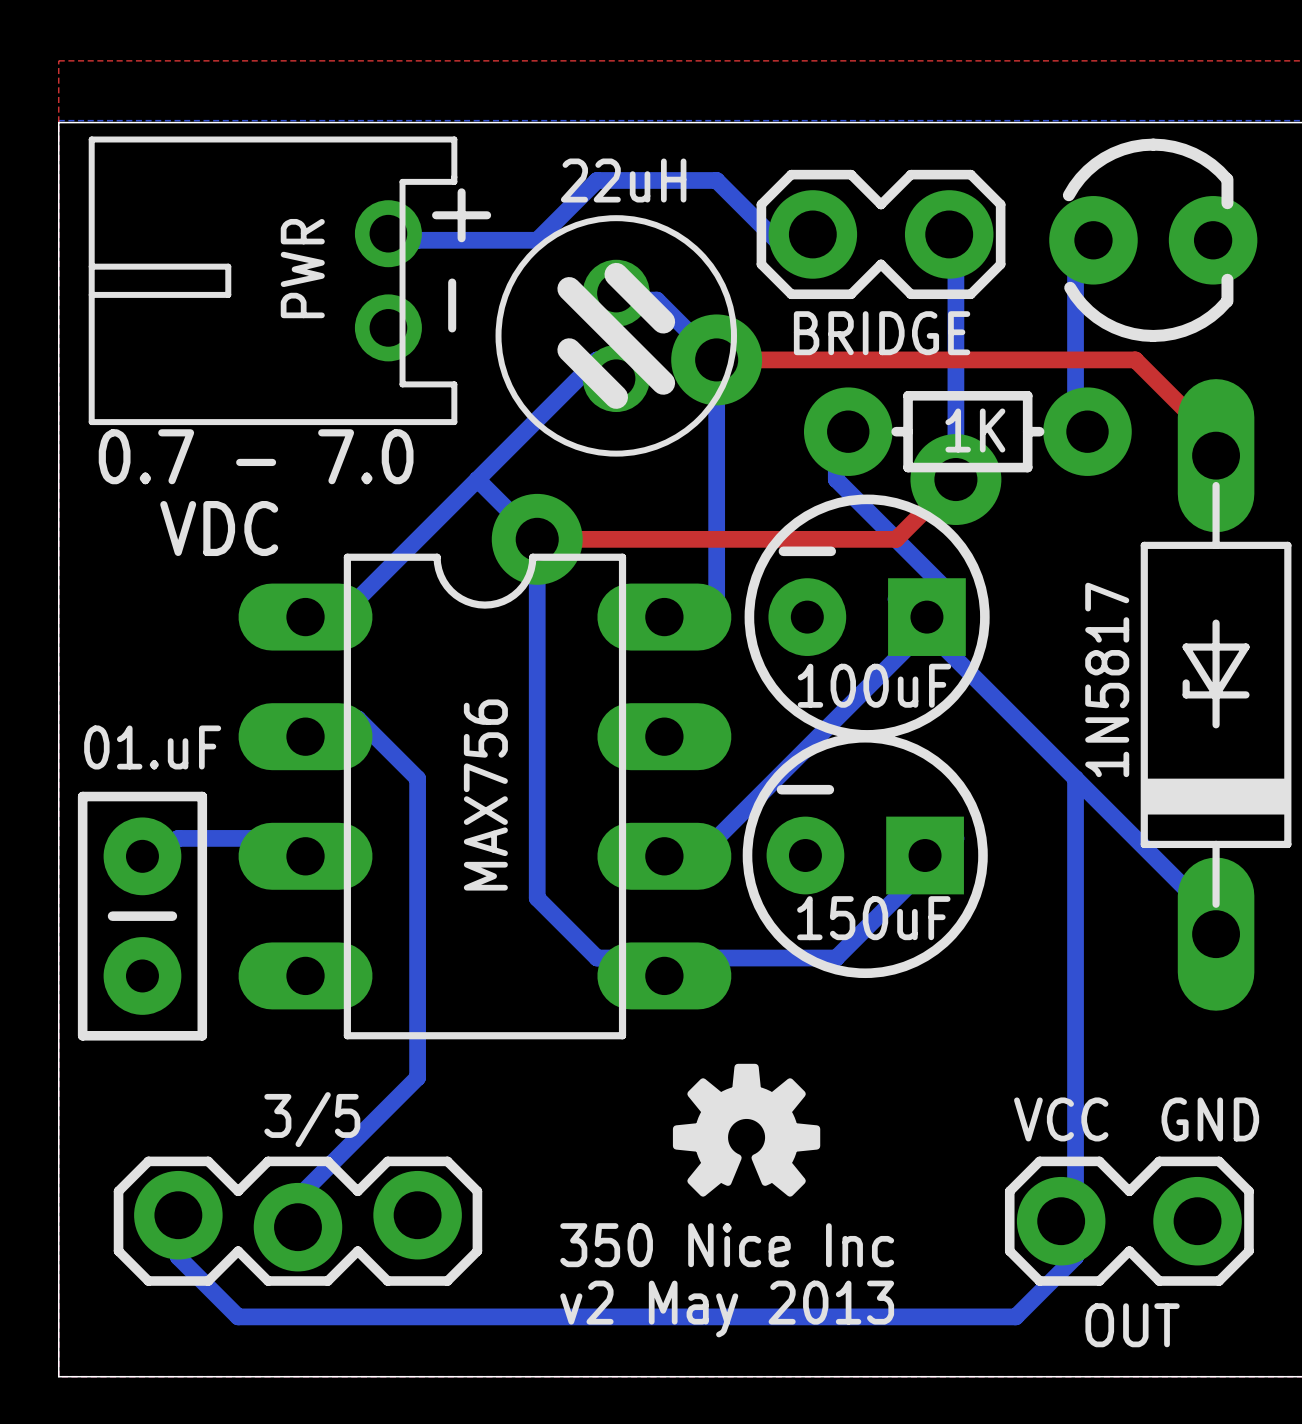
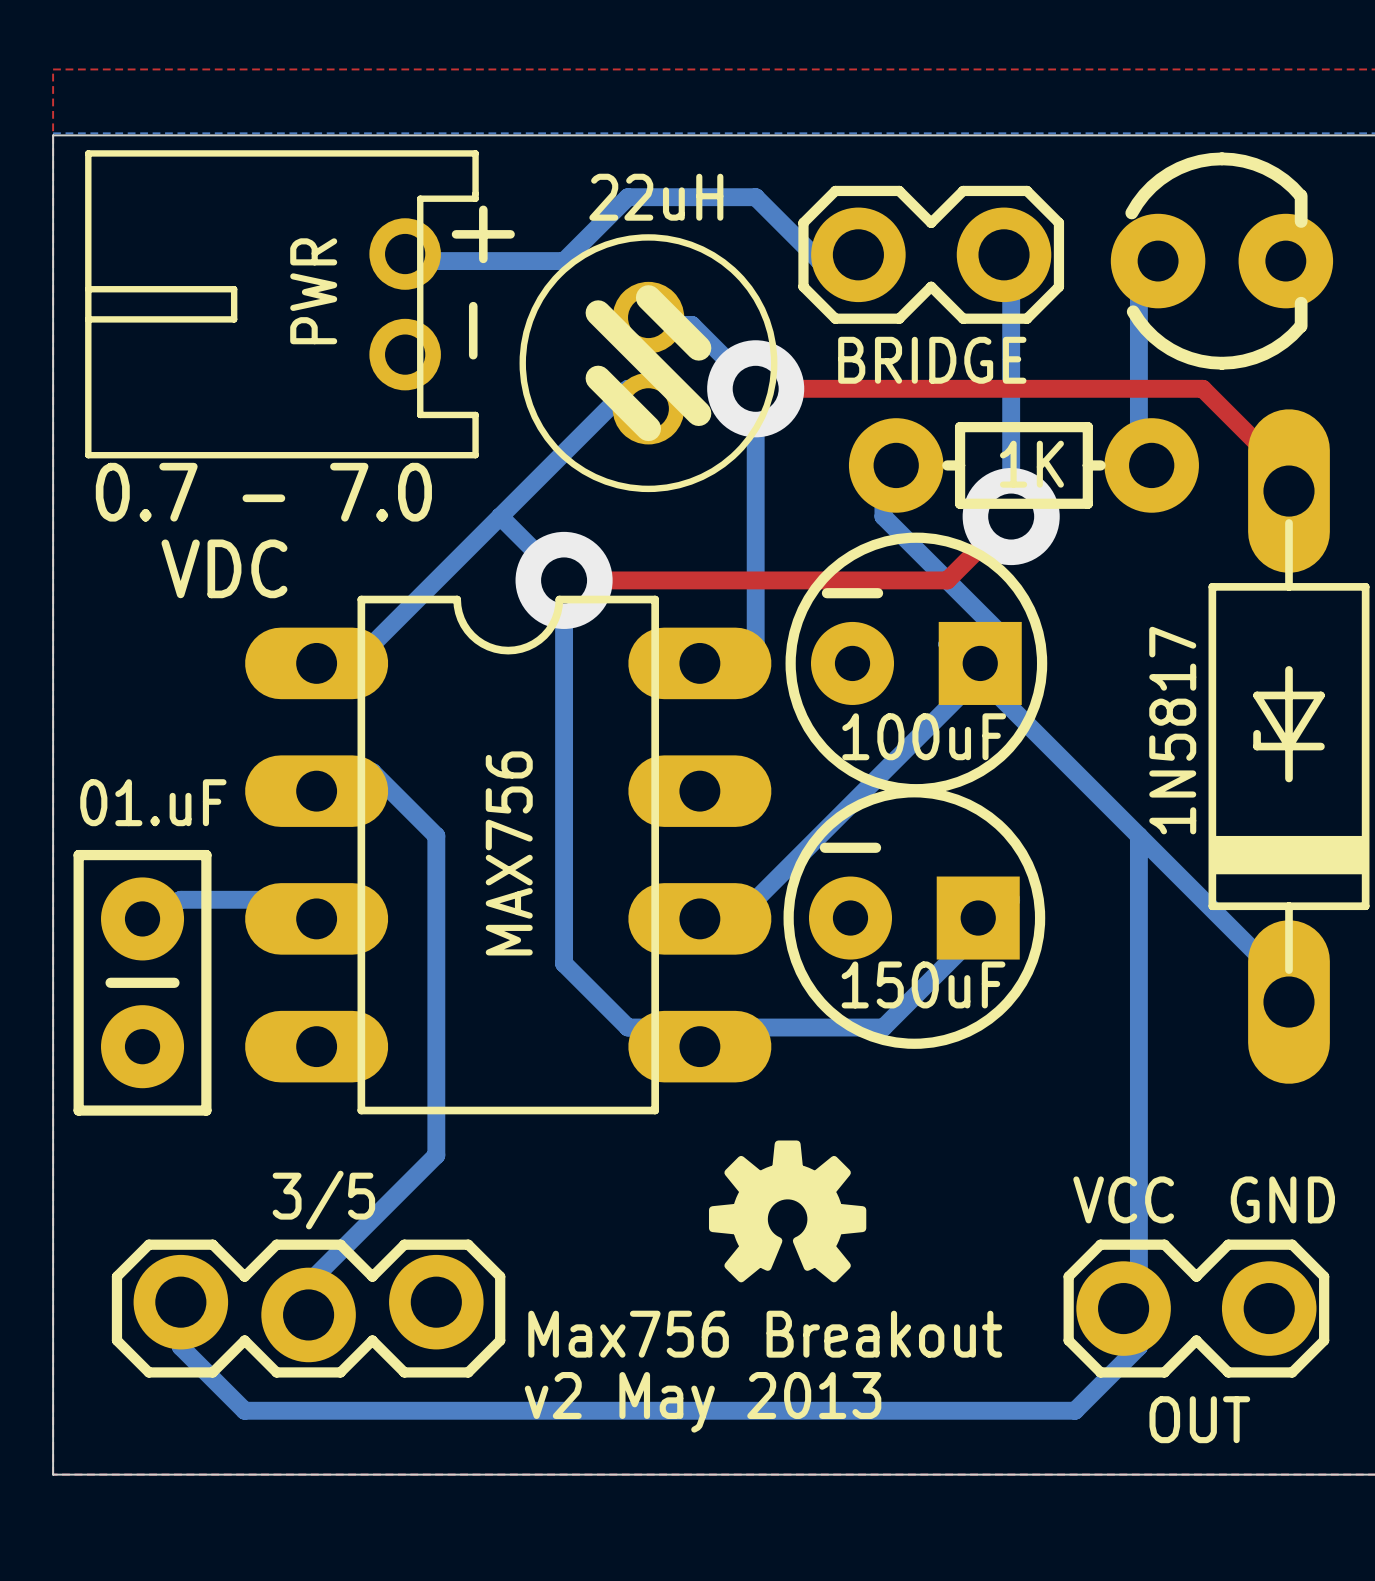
text: none -> Max756 Breakout (765, 1334)
text: 350 Nice Inc (727, 1245) -> none
text position: v2 May 2013 (727, 1308) -> v2 May 2013 (703, 1402)

